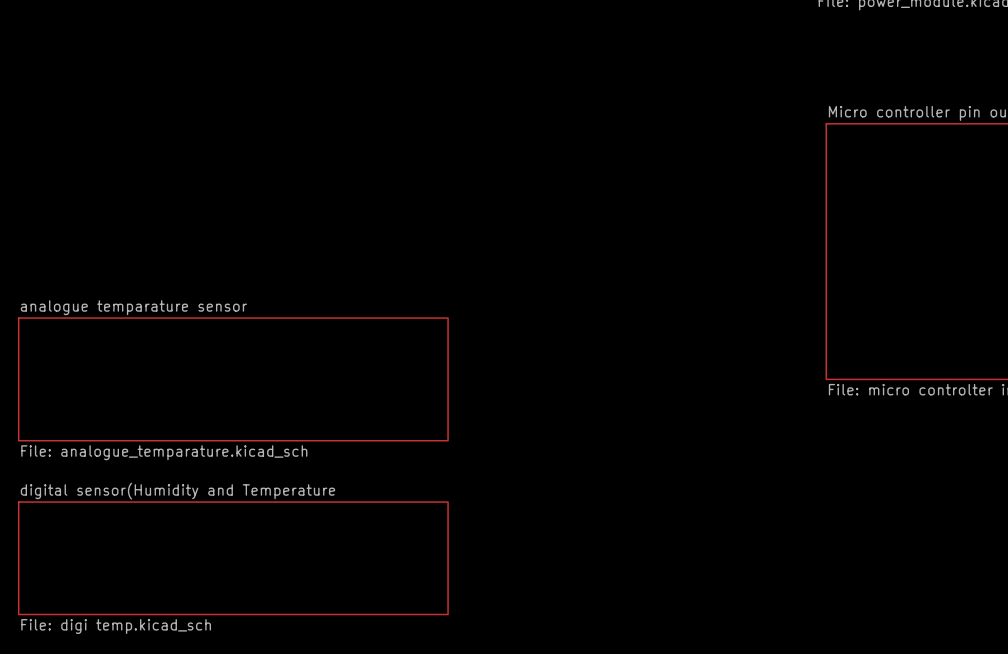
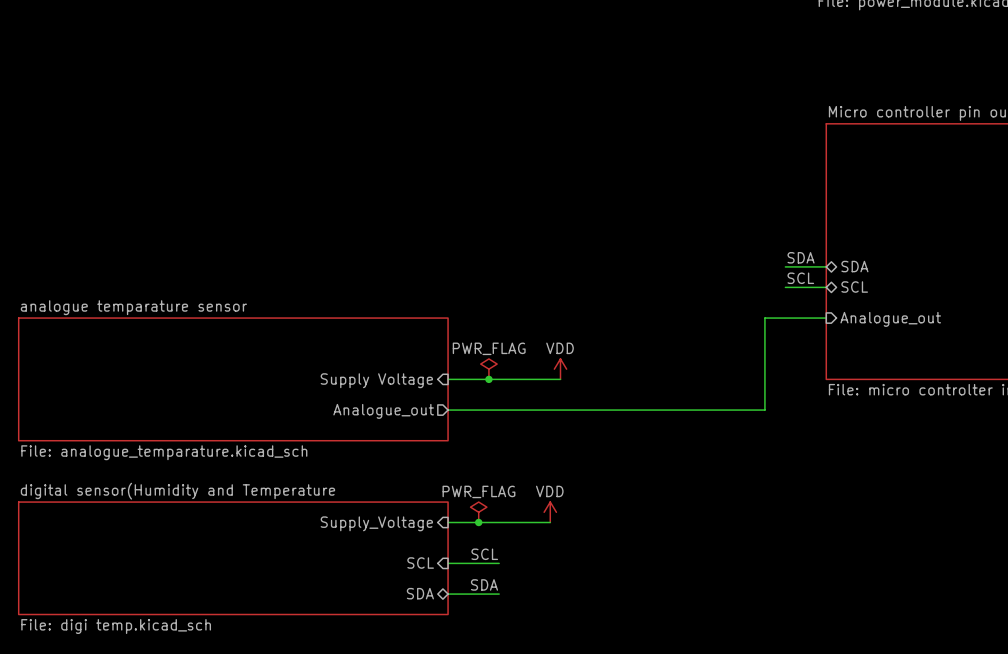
label: none -> SDA (801, 257)
wire: none -> (785, 266) (826, 266)
sheet pin: none -> SDA (854, 266)
label: none -> SCL (800, 278)
wire: none -> (785, 287) (826, 287)
sheet pin: none -> SCL (854, 287)
wire: none -> (826, 318) (764, 318) (764, 410) (448, 410)
sheet pin: none -> Analogue_out (890, 319)
power symbol: none -> PWR_FLAG (488, 369)
power symbol: none -> VDD (560, 369)
wire: none -> (448, 379) (560, 379)
junction: none -> (488, 379)
sheet pin: none -> Supply Voltage (376, 380)
sheet pin: none -> Analogue_out (383, 411)
power symbol: none -> PWR_FLAG (478, 512)
power symbol: none -> VDD (550, 512)
wire: none -> (448, 522) (550, 522)
junction: none -> (478, 522)
sheet pin: none -> Supply_Voltage (376, 523)
label: none -> SCL (484, 554)
sheet pin: none -> SCL (420, 563)
wire: none -> (448, 563) (499, 563)
label: none -> SDA (484, 584)
sheet pin: none -> SDA (420, 593)
wire: none -> (448, 594) (499, 594)

